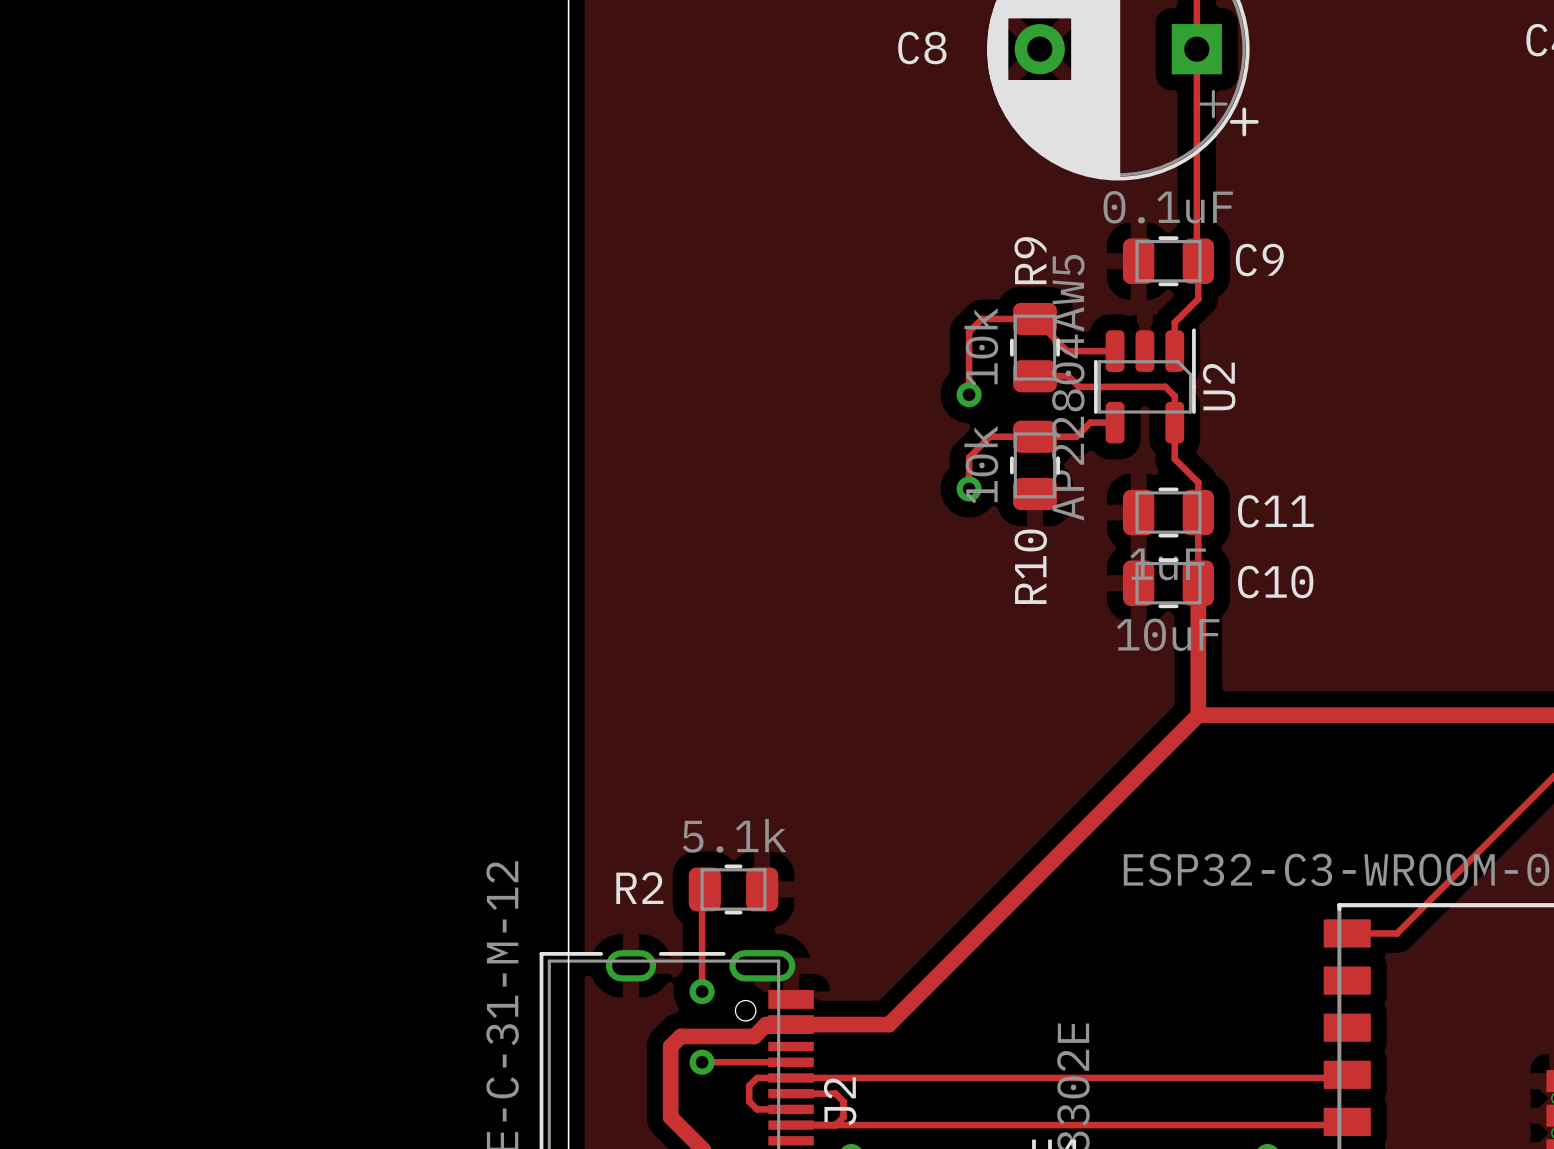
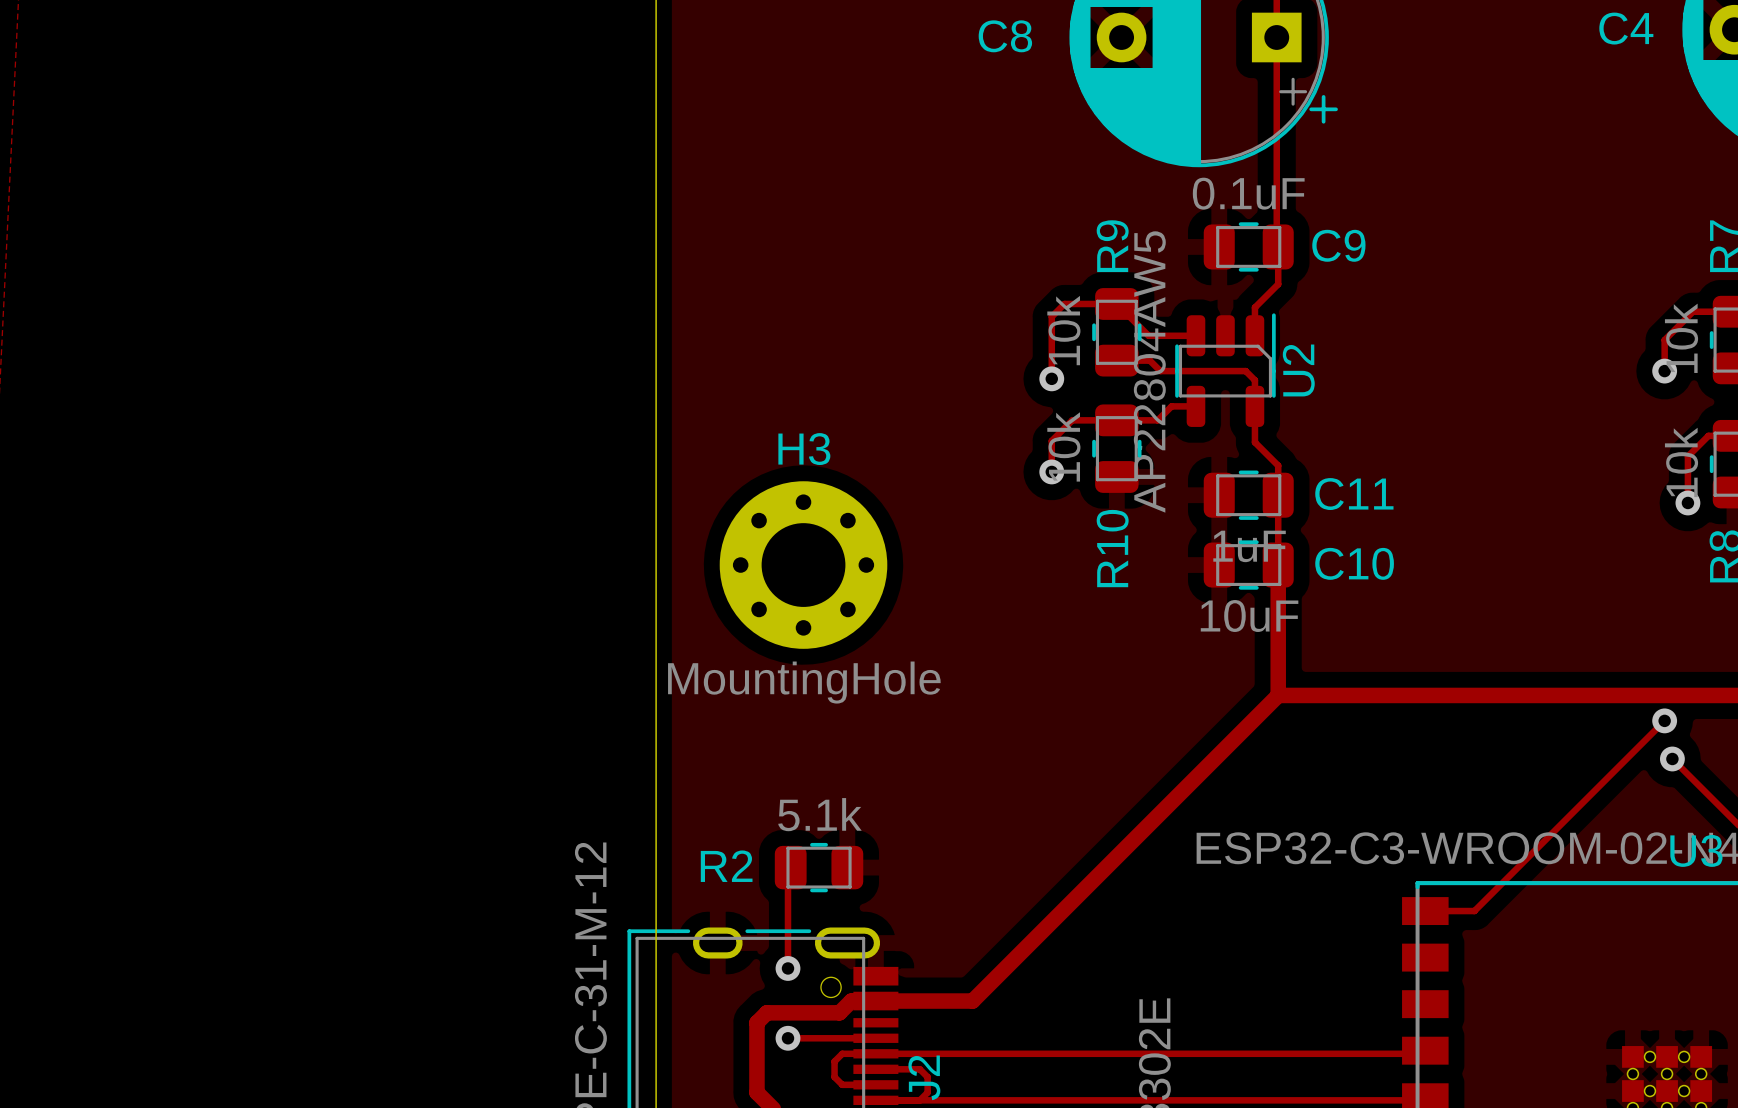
H3: none -> MountingHole (803, 565)

